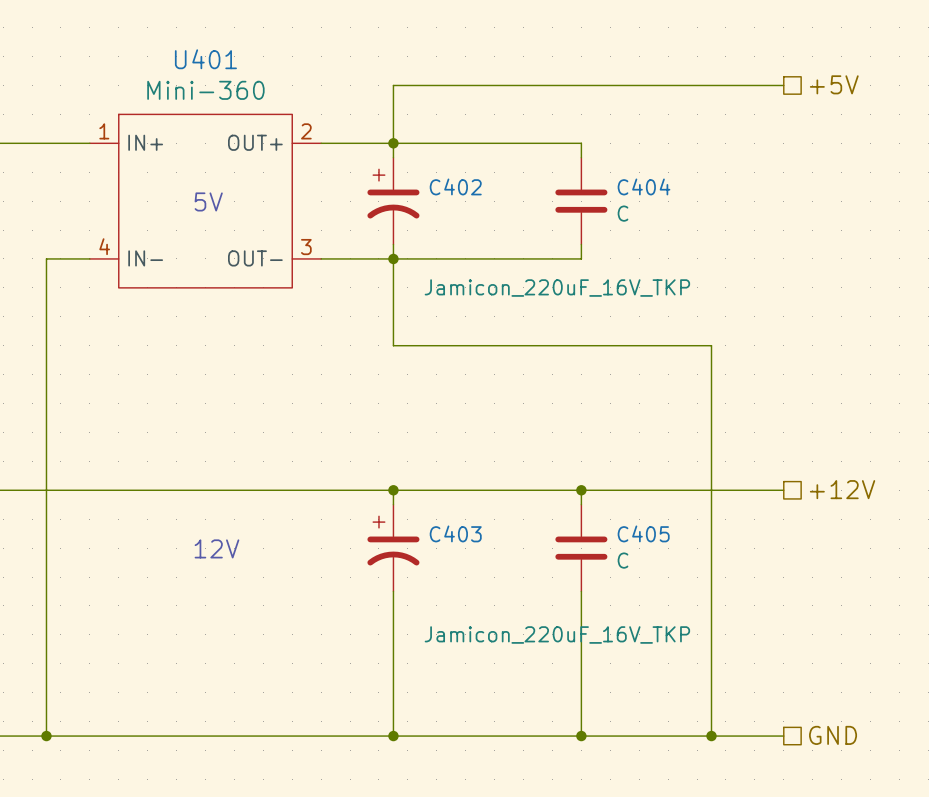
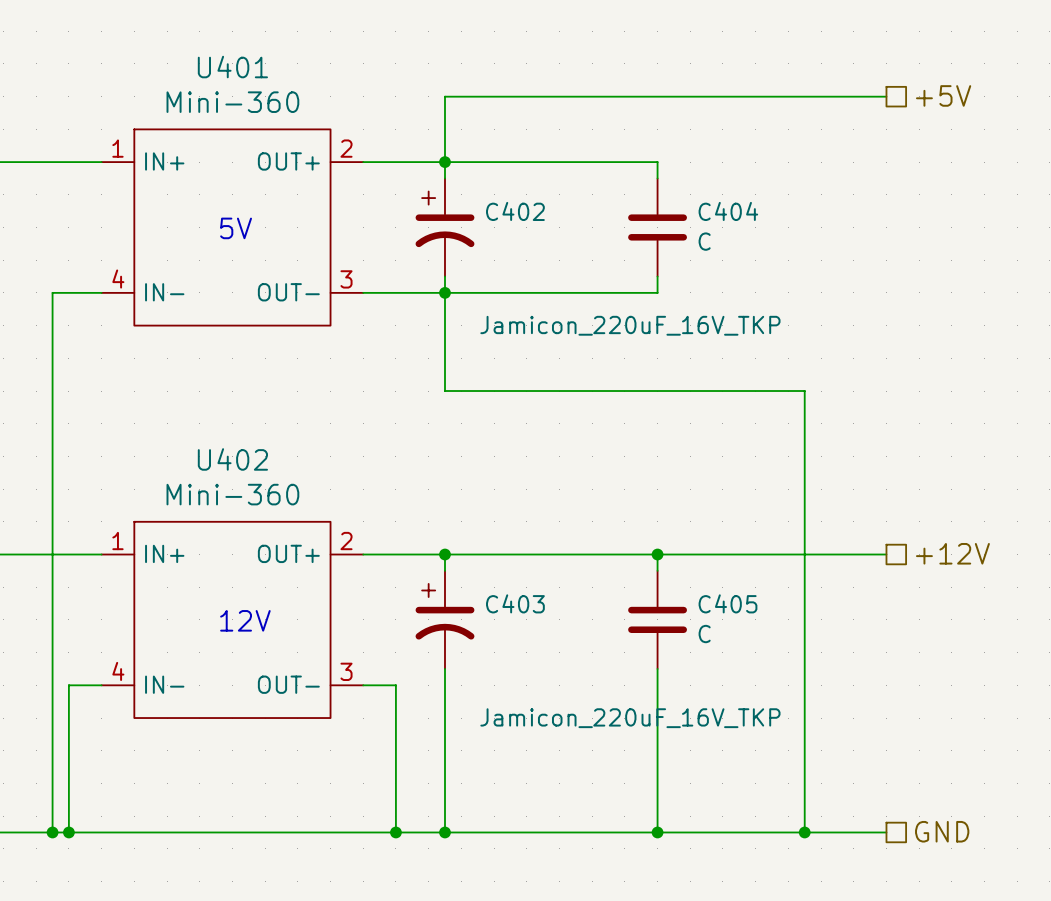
wire: (89, 490) (321, 490) -> none
U402: none -> Mini-360 (232, 619)
wire: none -> (101, 685) (68, 685) (68, 832)
wire: none -> (363, 685) (395, 685) (395, 832)
junction: none -> (68, 832)
junction: none -> (395, 832)

